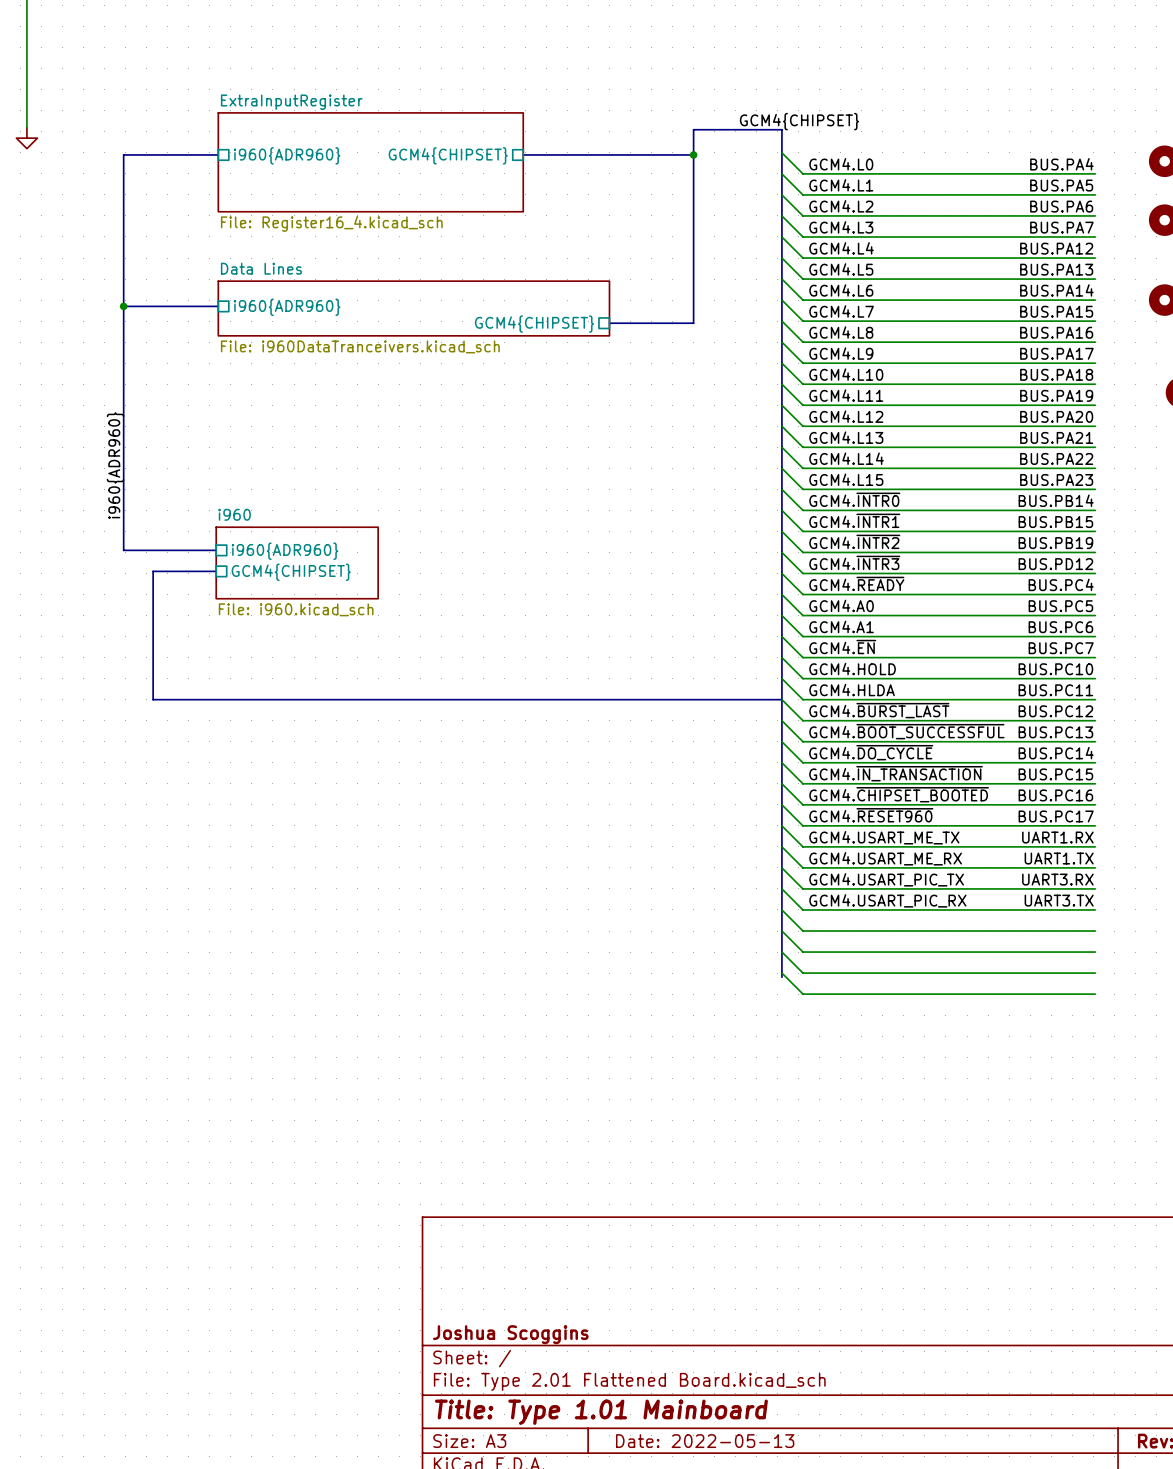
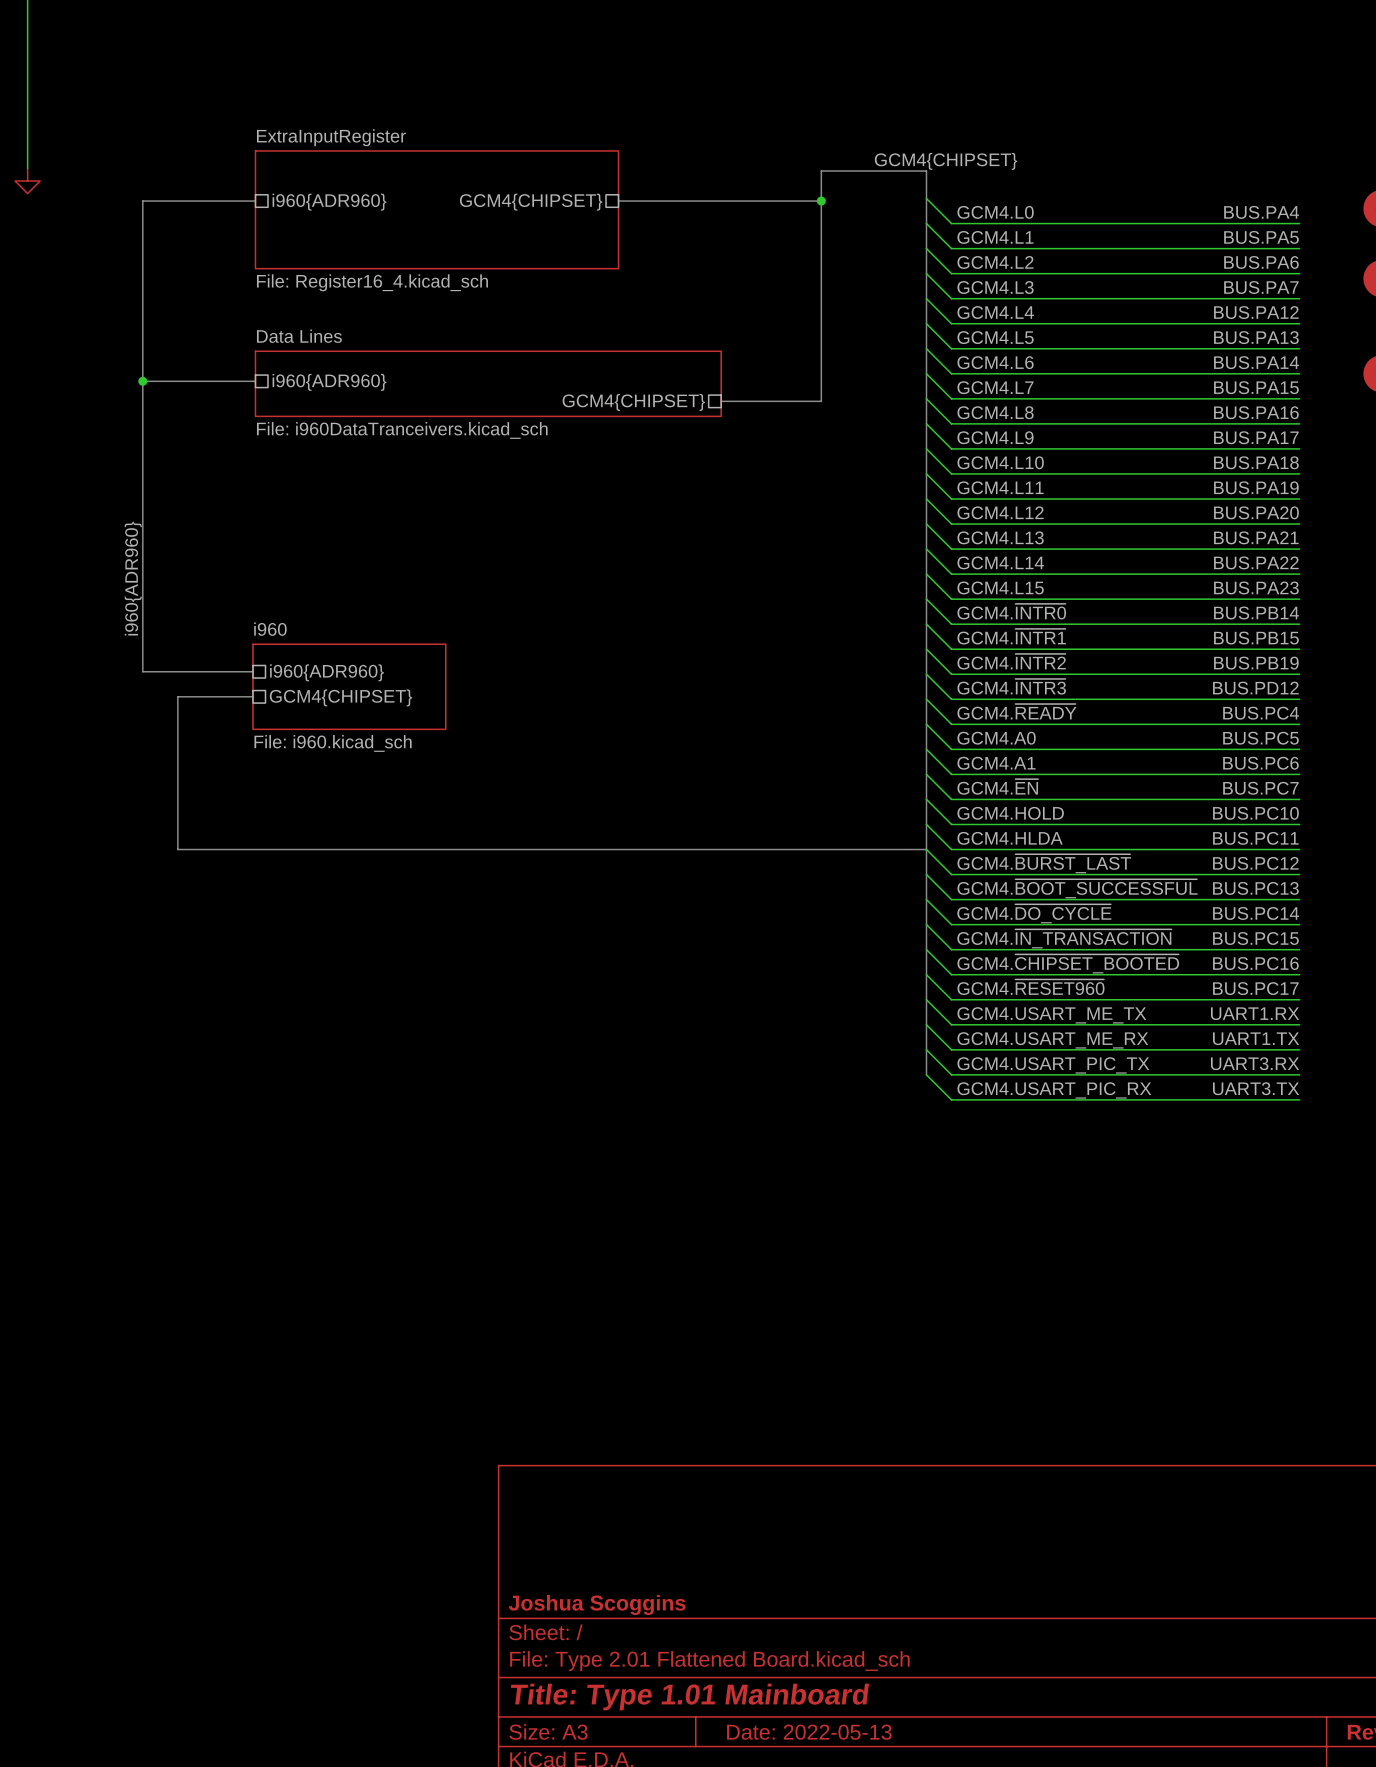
bus: (781, 888) (781, 977) -> none
wire: (781, 909) (802, 931) (1095, 931) -> none
wire: (781, 931) (802, 952) (1095, 952) -> none
wire: (781, 952) (802, 973) (1095, 973) -> none
wire: (781, 973) (802, 994) (1095, 994) -> none

